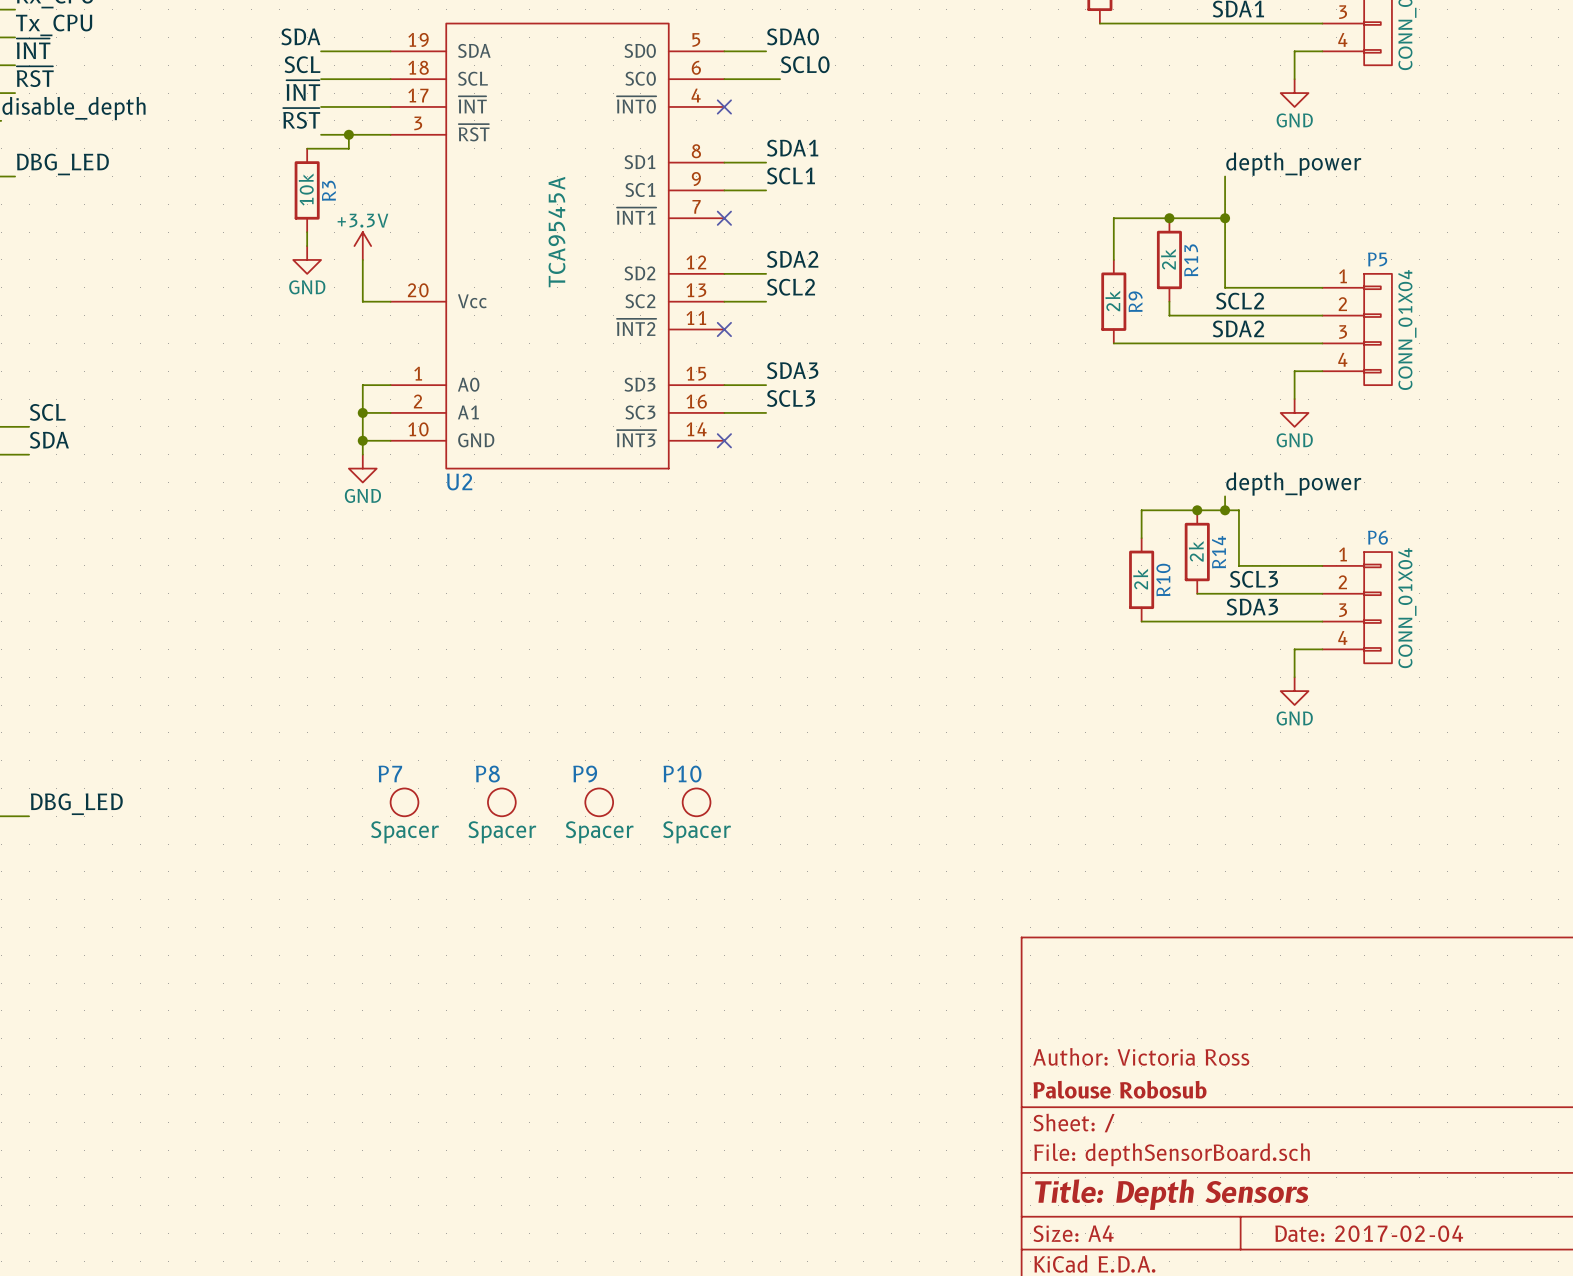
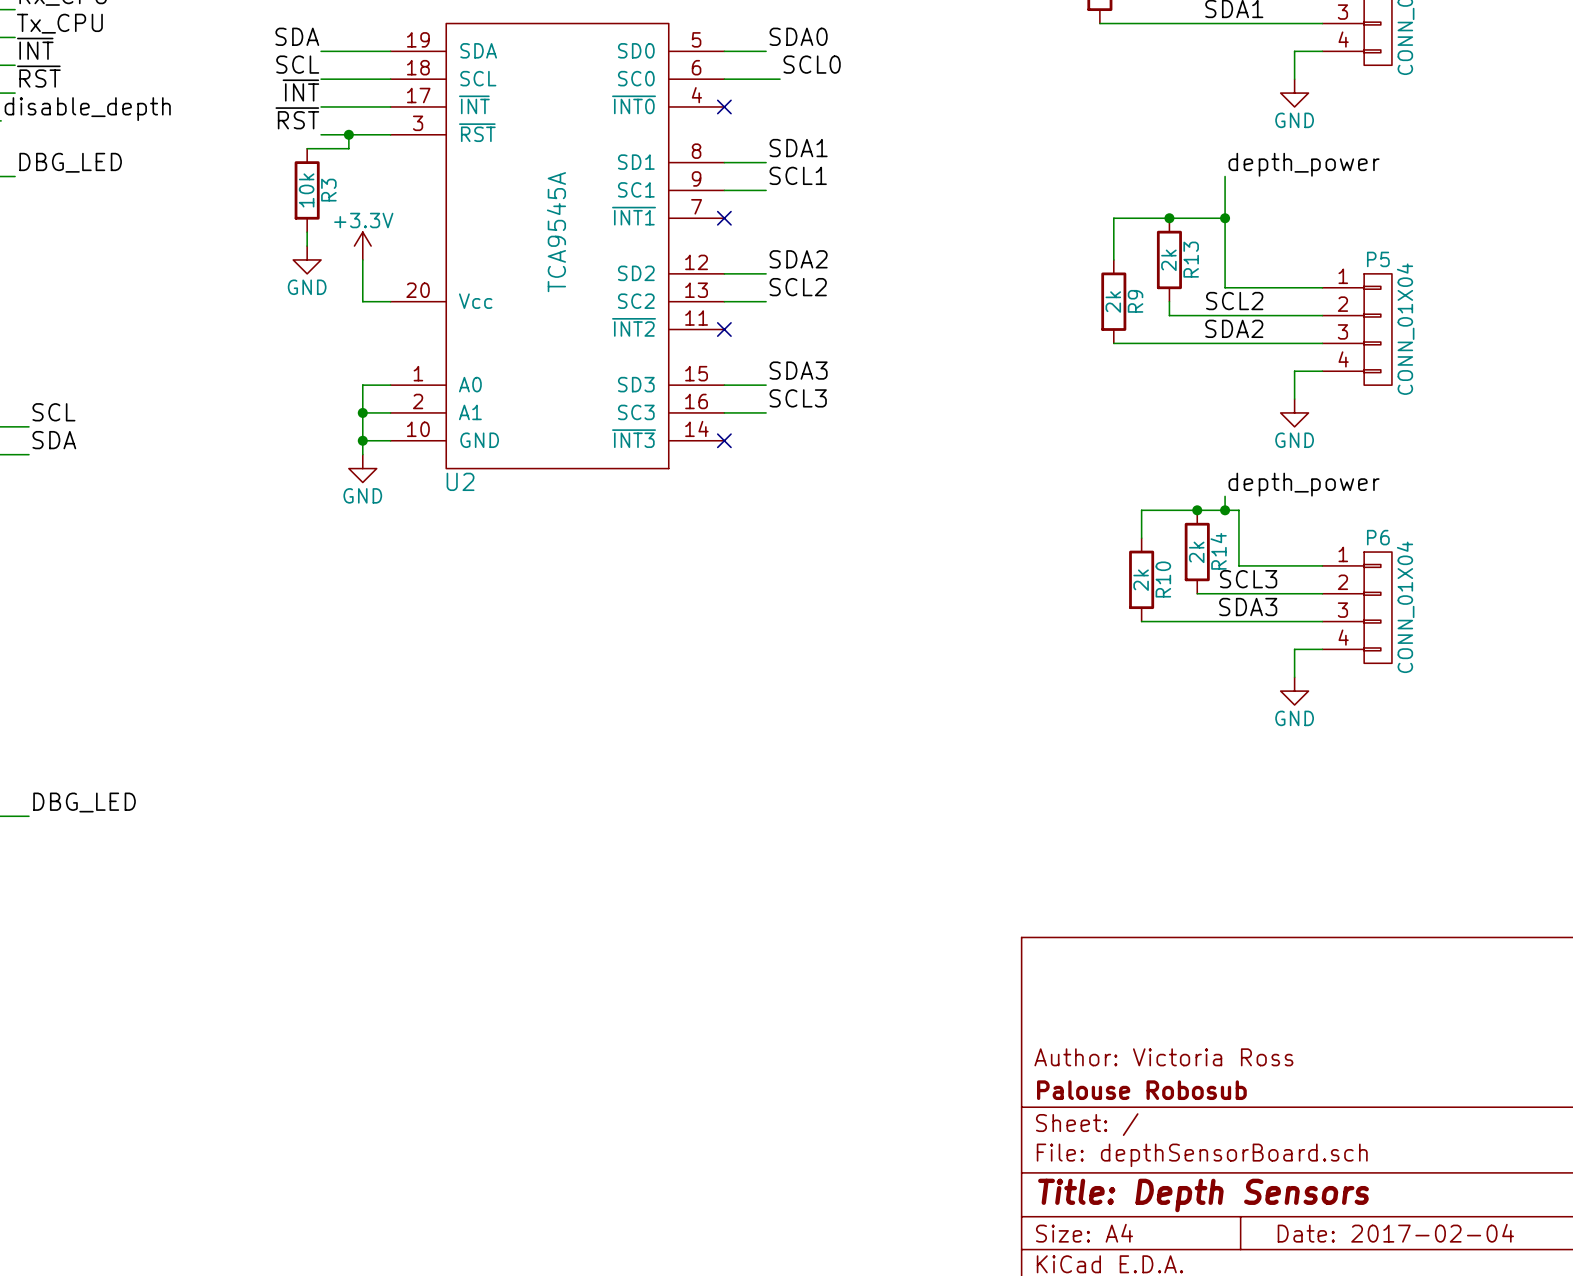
P7: Spacer (404, 802) -> none
P8: Spacer (501, 802) -> none
P9: Spacer (599, 802) -> none
P10: Spacer (696, 802) -> none

